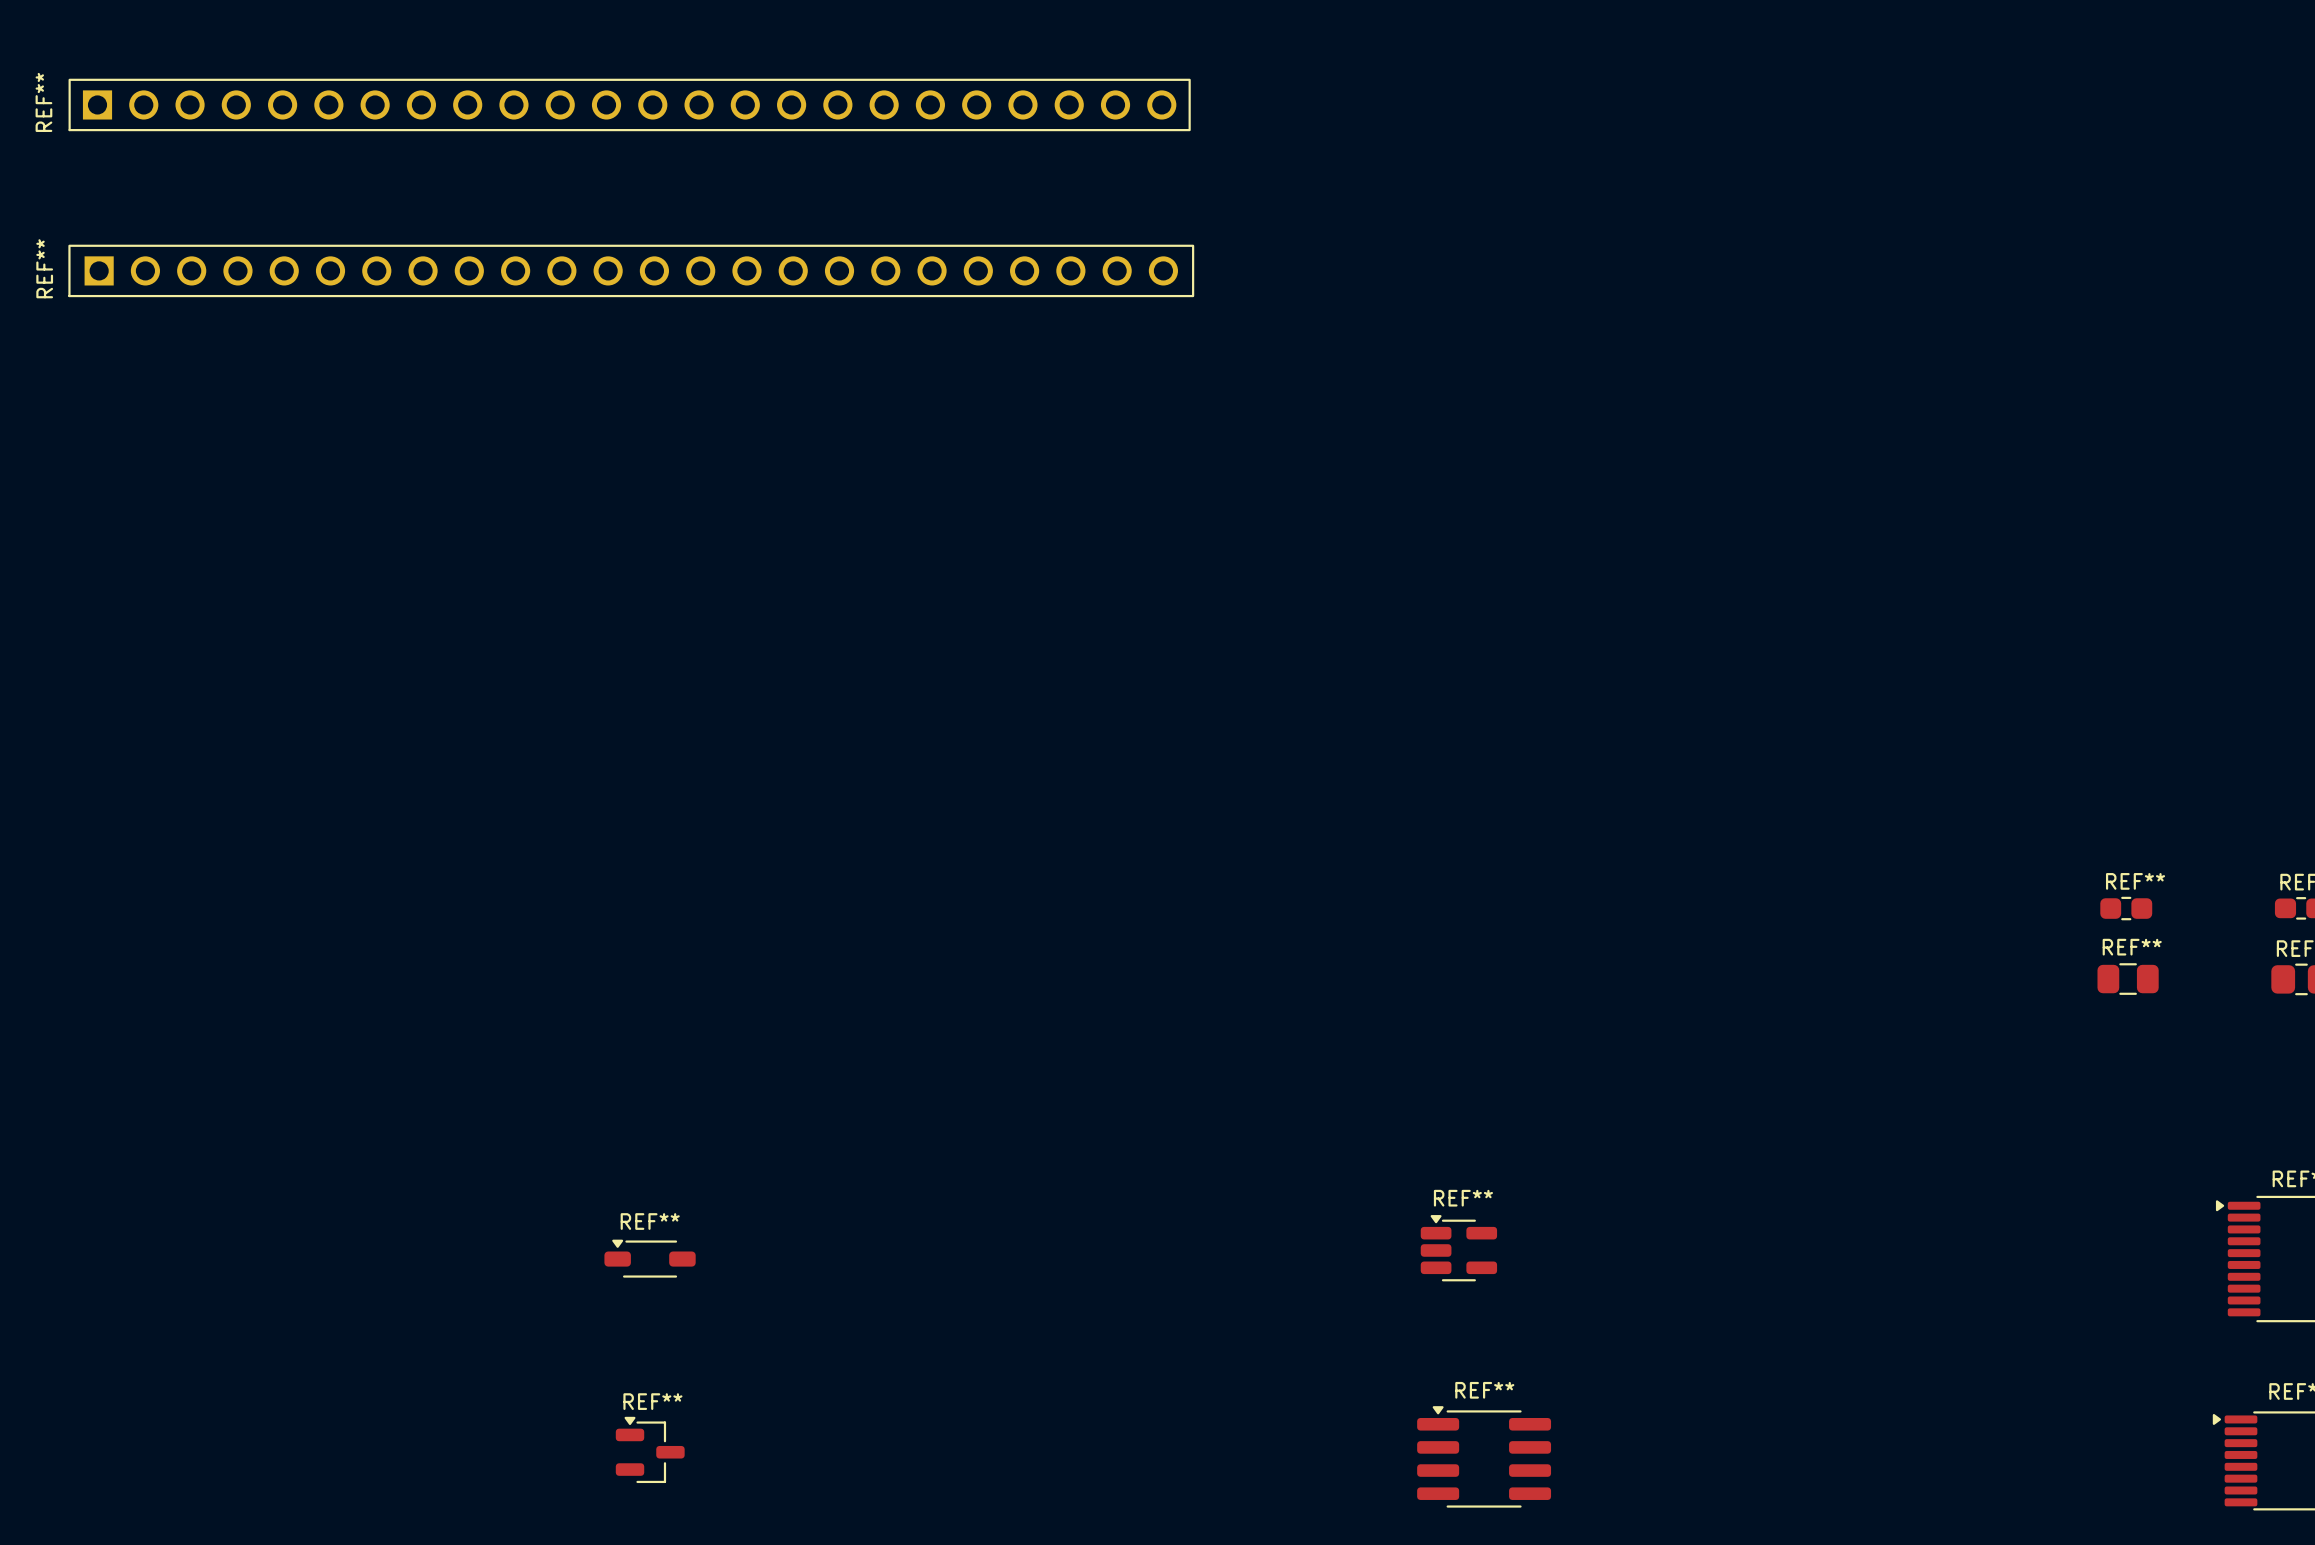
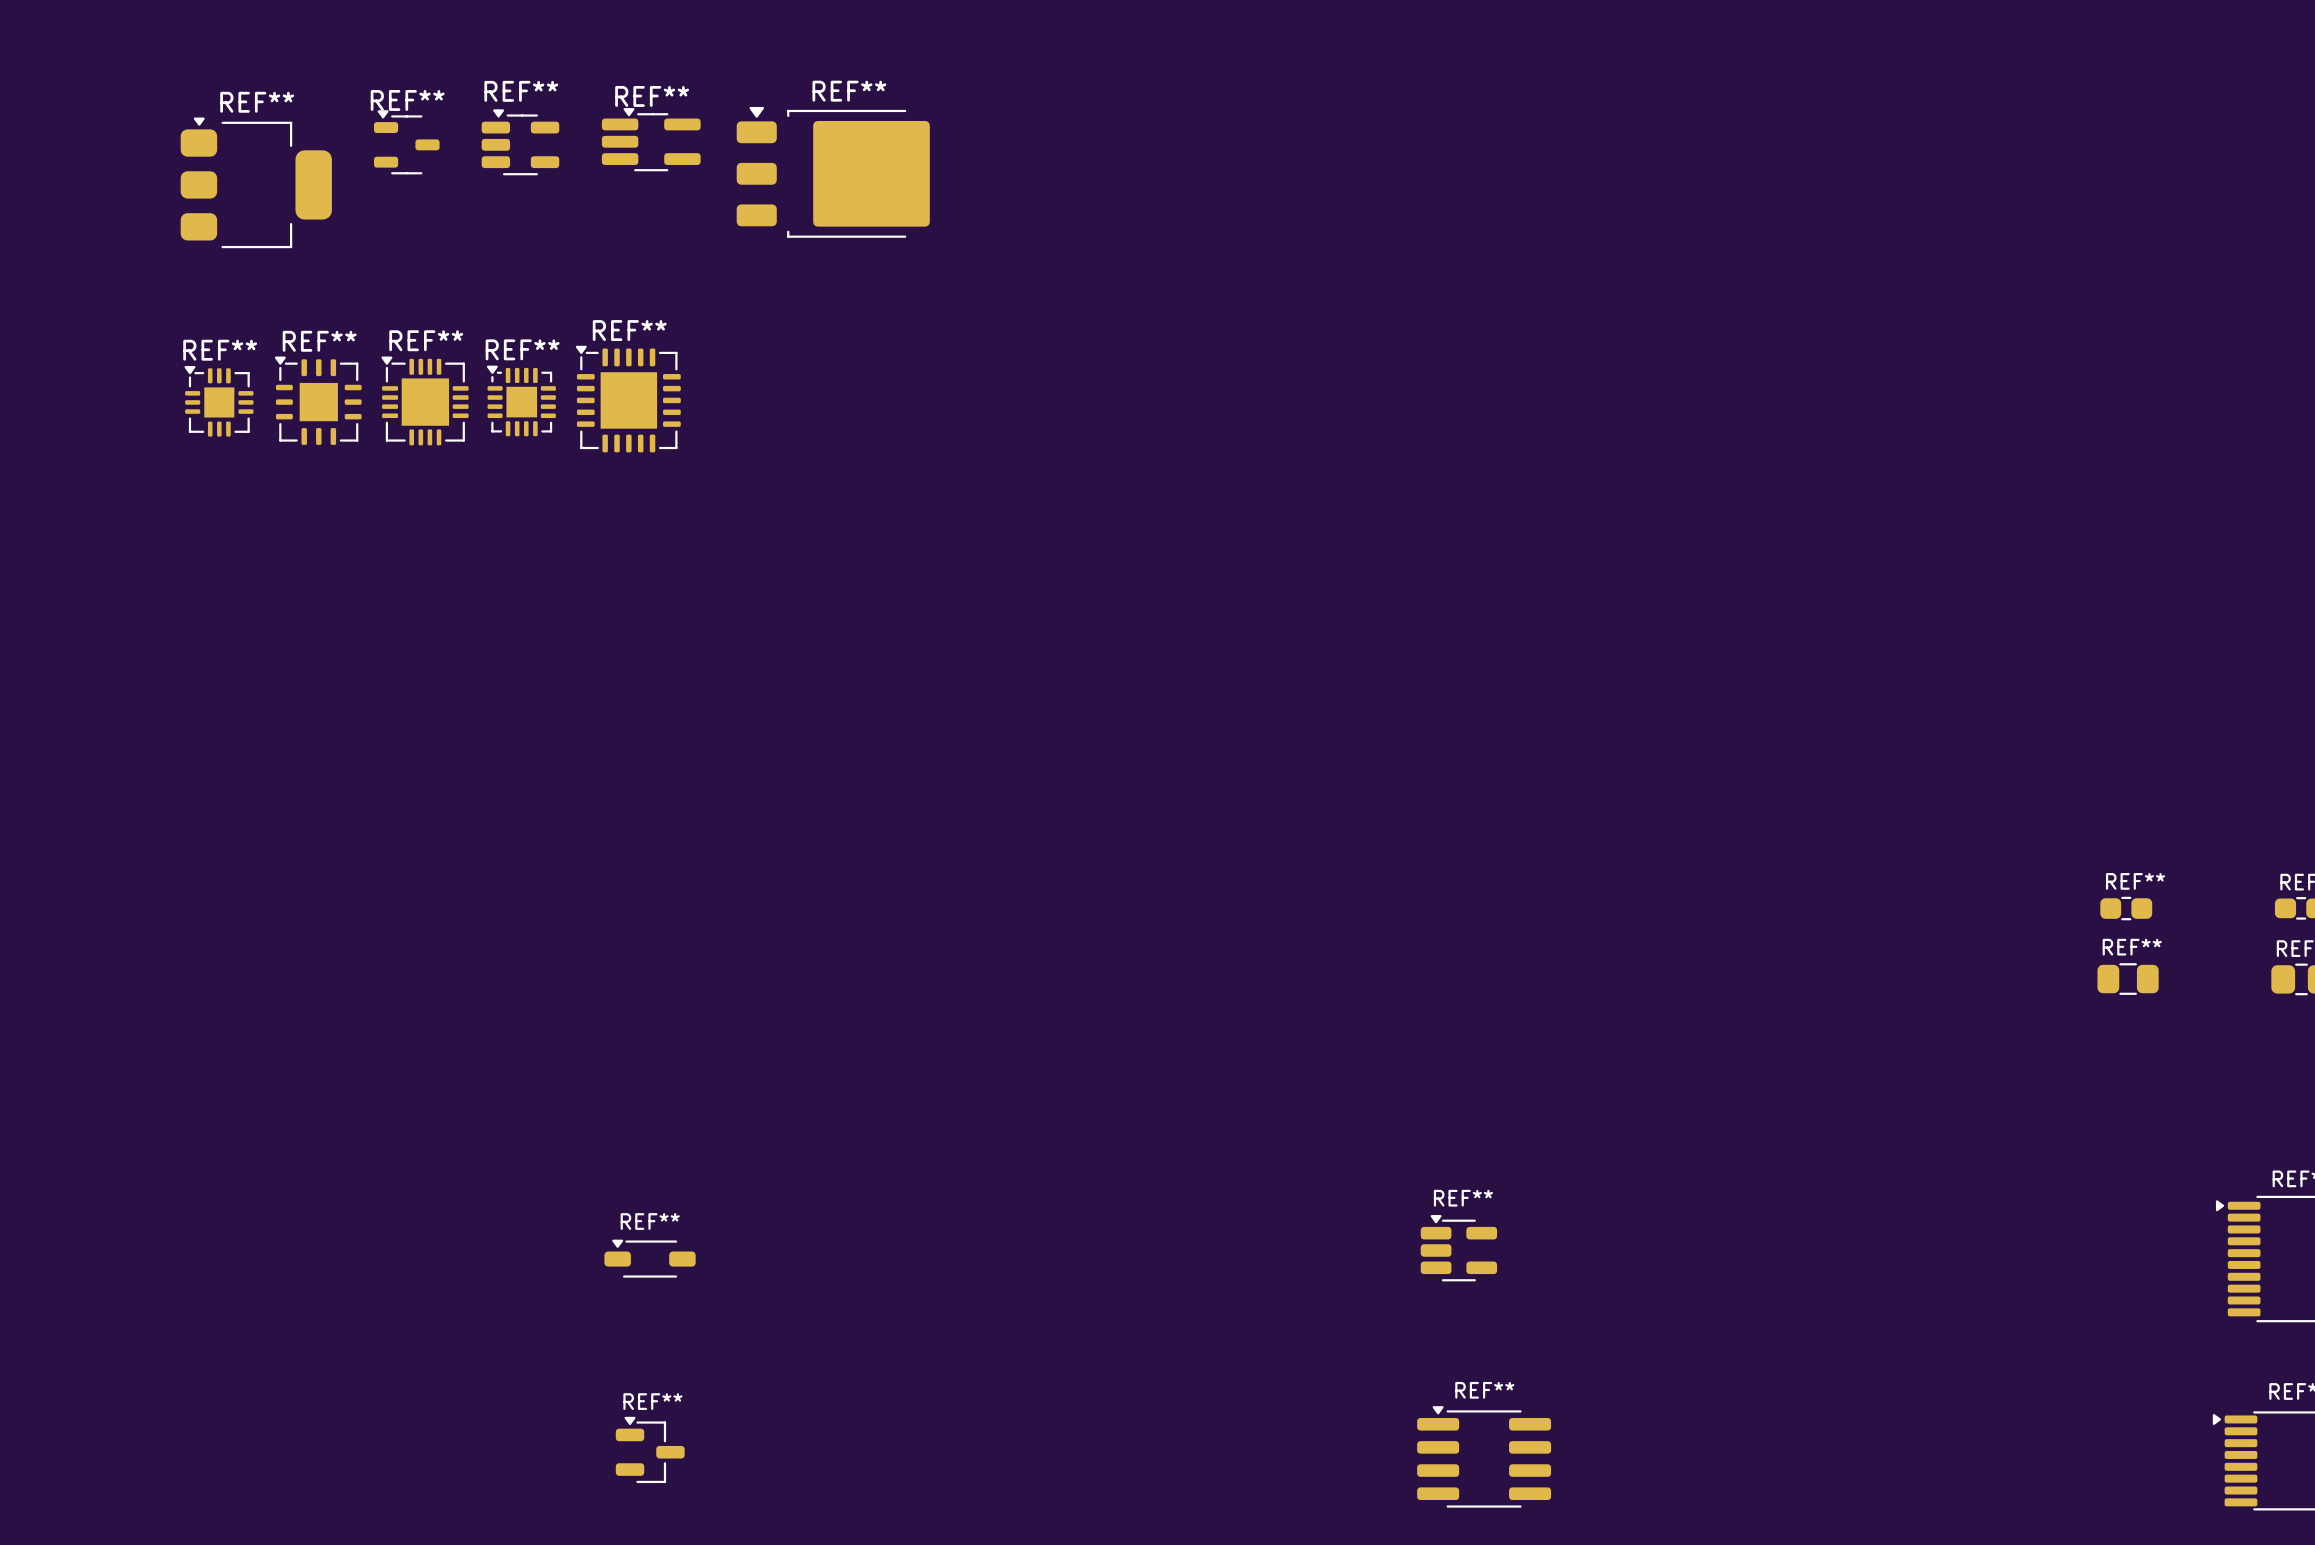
REF**: (629, 104) -> none
REF**: none -> (651, 139)
REF**: none -> (406, 142)
REF**: none -> (520, 142)
REF**: none -> (833, 172)
REF**: none -> (256, 182)
REF**: (631, 270) -> none
REF**: none -> (628, 399)
REF**: none -> (318, 400)
REF**: none -> (425, 400)
REF**: none -> (521, 400)
REF**: none -> (219, 401)

